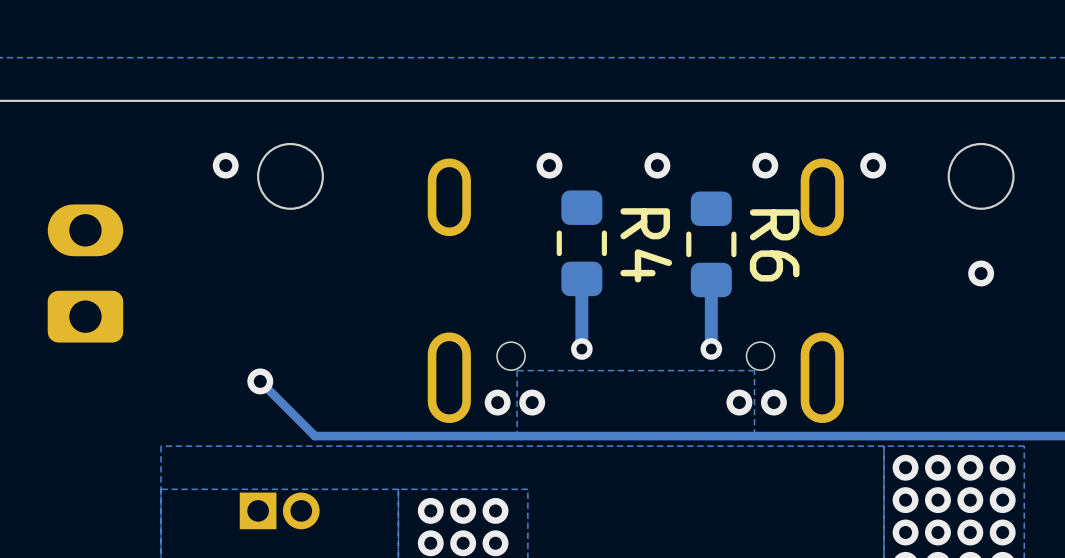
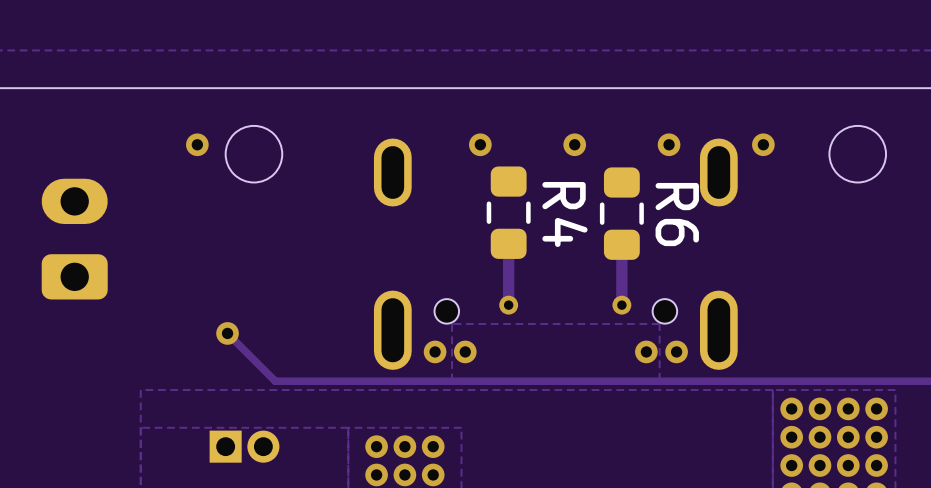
via: (981, 273) -> none

